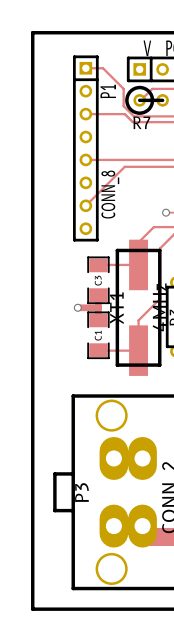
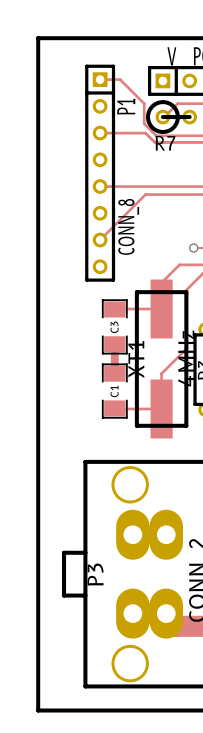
track: (77, 307) (98, 307) -> none
via: (77, 307) -> none

